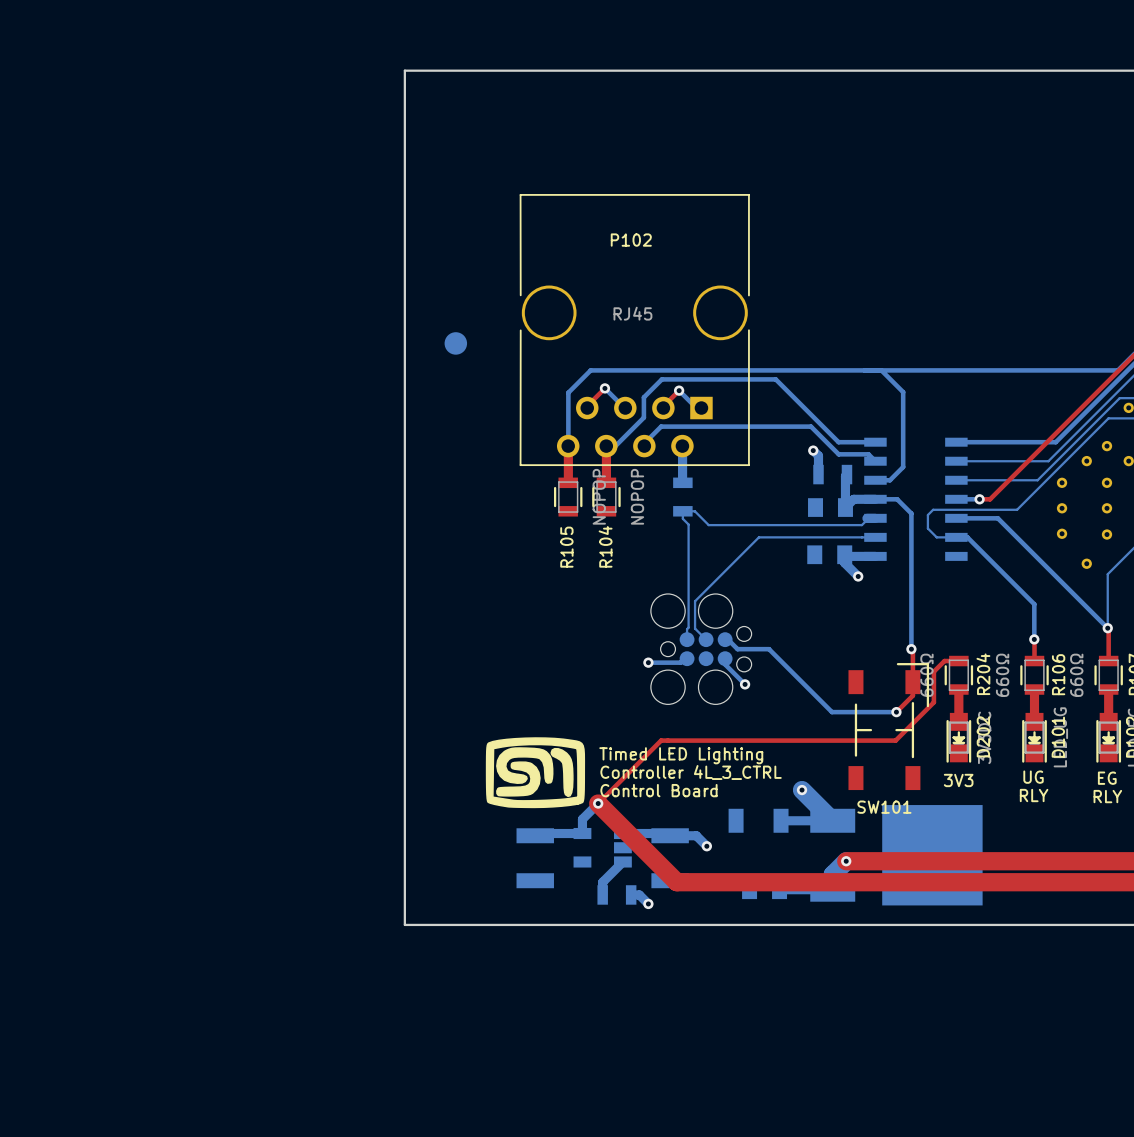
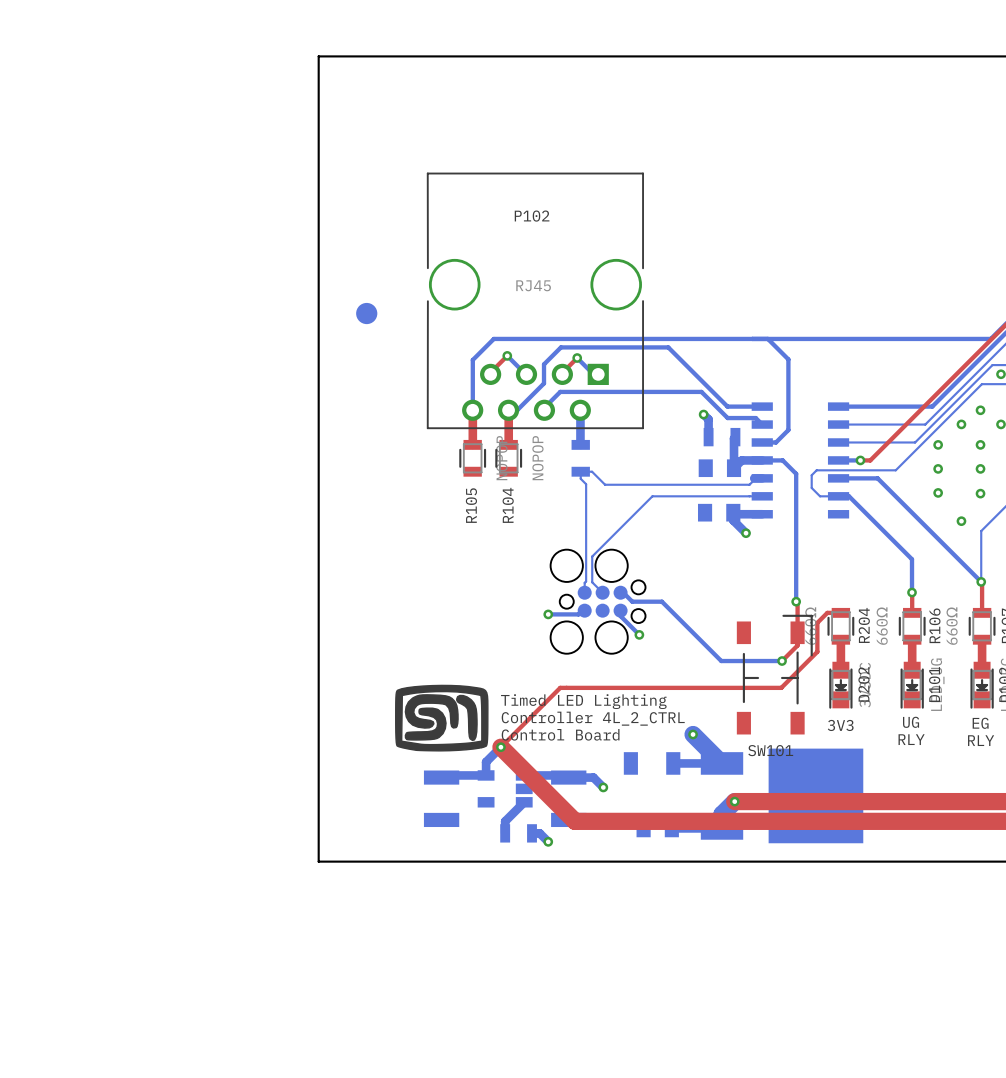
text: Controller 4L_3_CTRL (691, 772) -> Controller 4L_2_CTRL (593, 718)

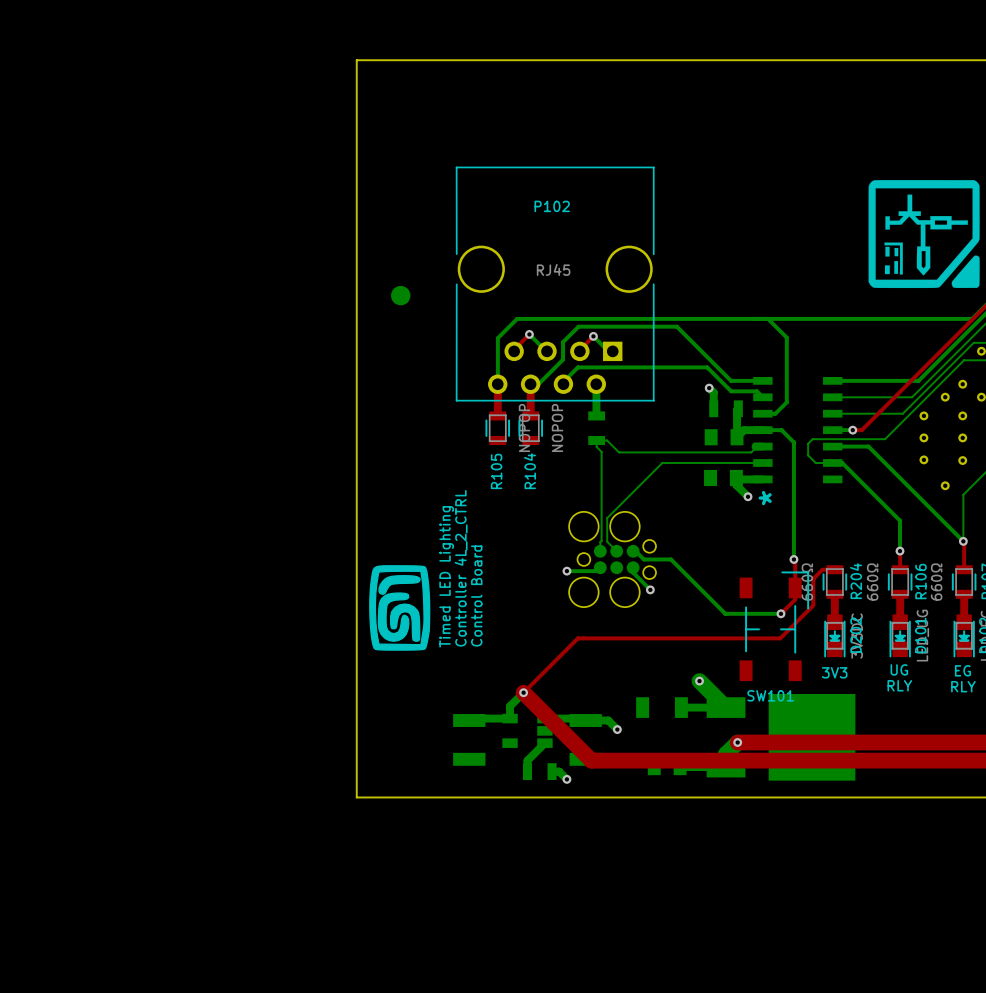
drawing: none -> [868, 180, 980, 289]
text: none -> * (765, 498)
drawing: none -> [369, 565, 431, 651]
drawing: [395, 684, 489, 752] -> none
text rotation: 0° (583, 701) -> 90° counterclockwise (446, 576)
text position: Timed LED Lighting (583, 701) -> Timed LED Lighting (446, 576)
text rotation: 0° (593, 718) -> 90° counterclockwise (461, 568)
text position: Controller 4L_2_CTRL (593, 718) -> Controller 4L_2_CTRL (461, 568)
text rotation: 0° (560, 734) -> 90° counterclockwise (476, 596)
text position: Control Board (560, 734) -> Control Board (476, 596)

